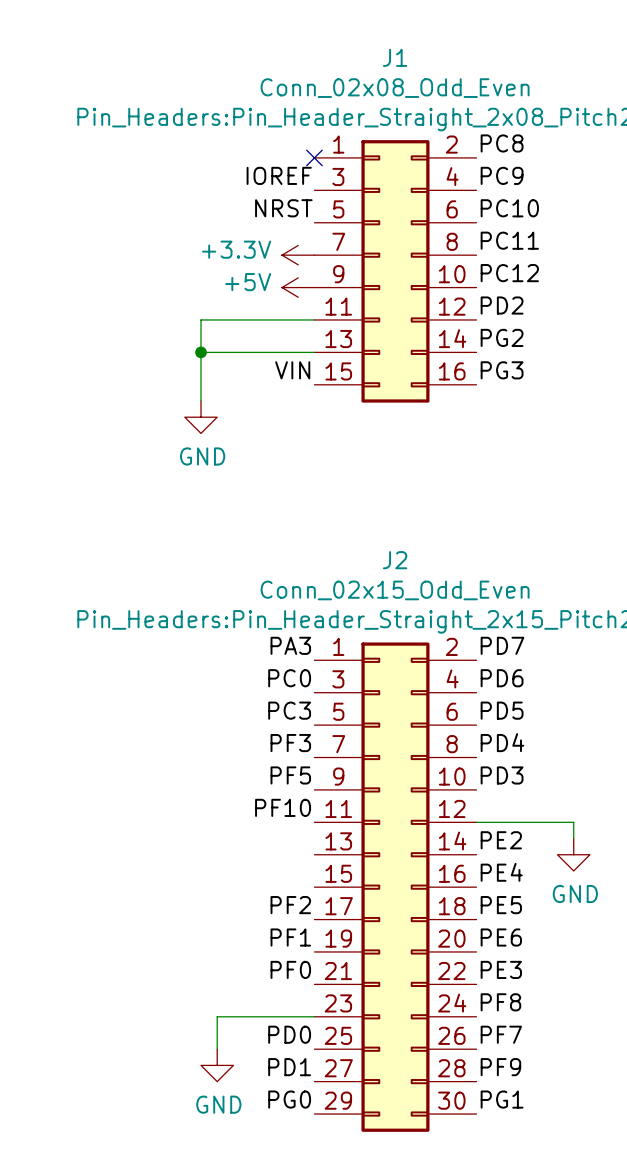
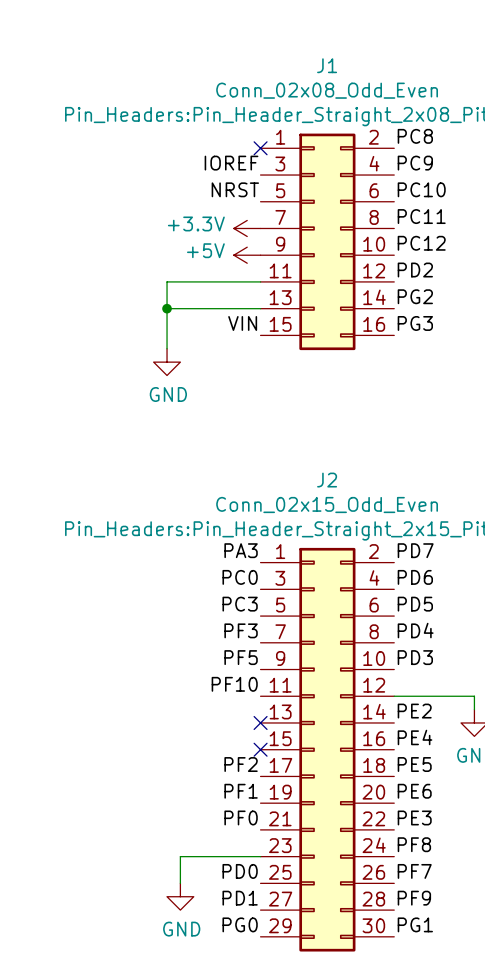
no-connect mark: none -> (260, 722)
no-connect mark: none -> (260, 749)

